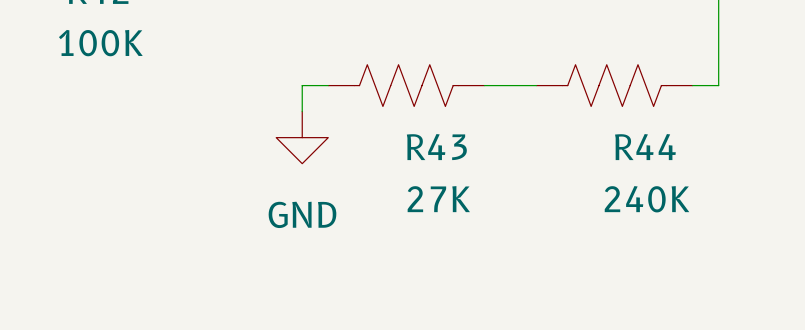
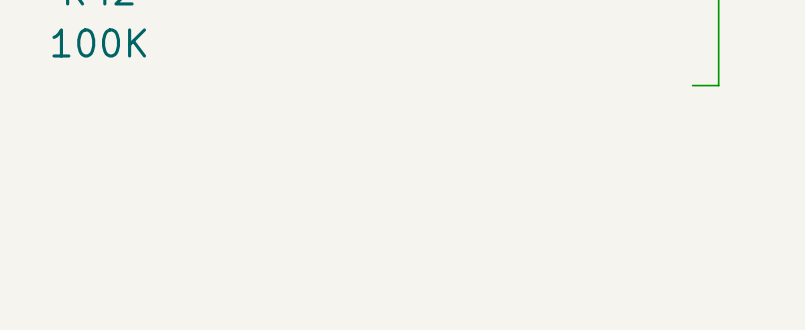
wire: (328, 85) (302, 85) (302, 111) -> none
R43: 27K (406, 85) -> none
wire: (484, 85) (536, 85) -> none
R44: 240K (614, 85) -> none
power symbol: GND (302, 137) -> none

